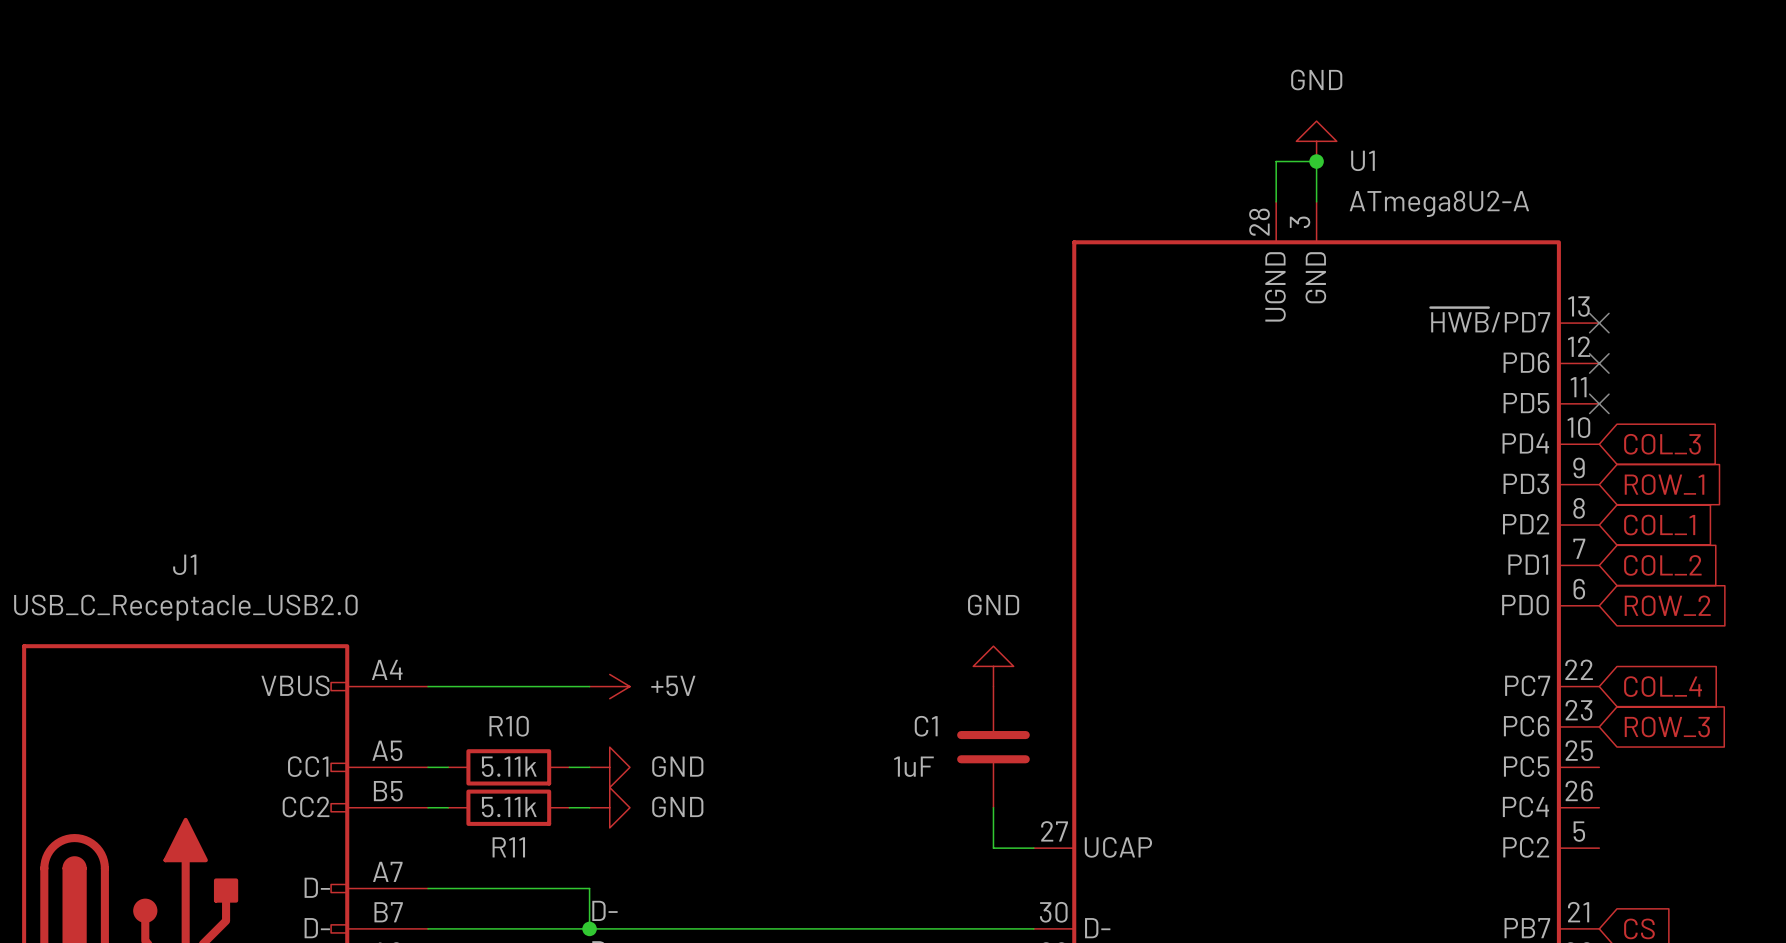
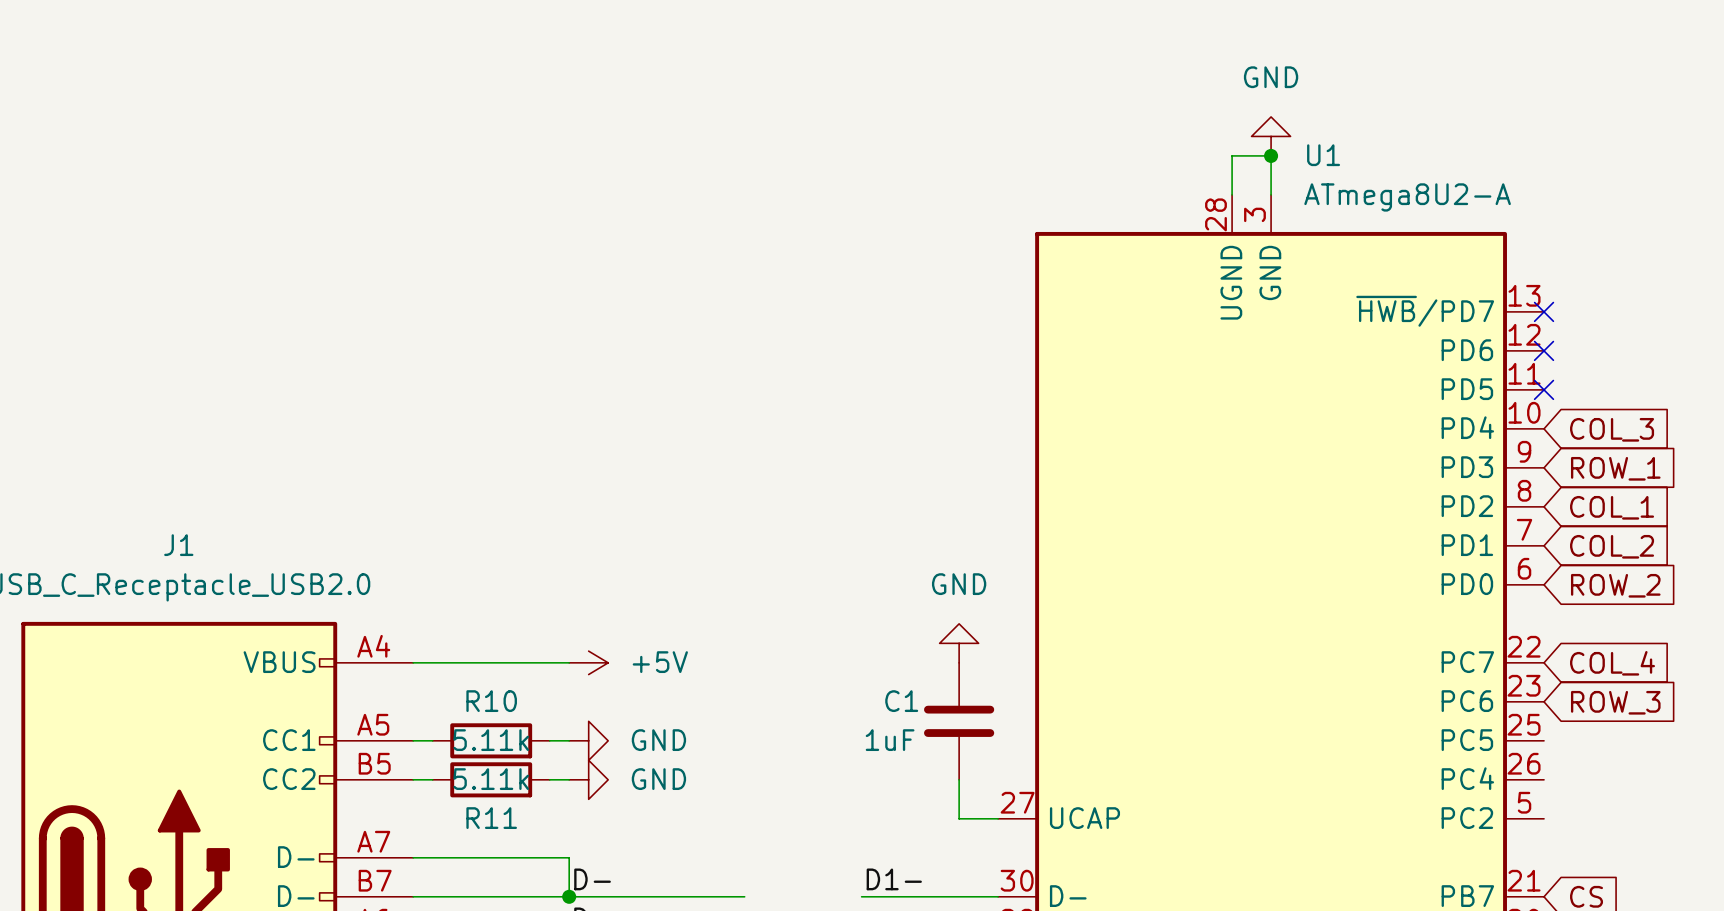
label: none -> D1- (894, 879)
wire: (771, 928) (892, 928) -> none

